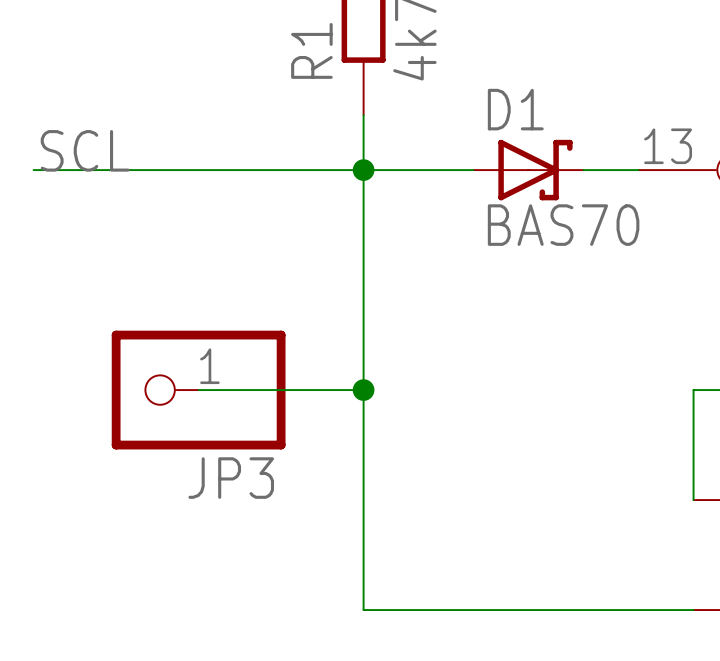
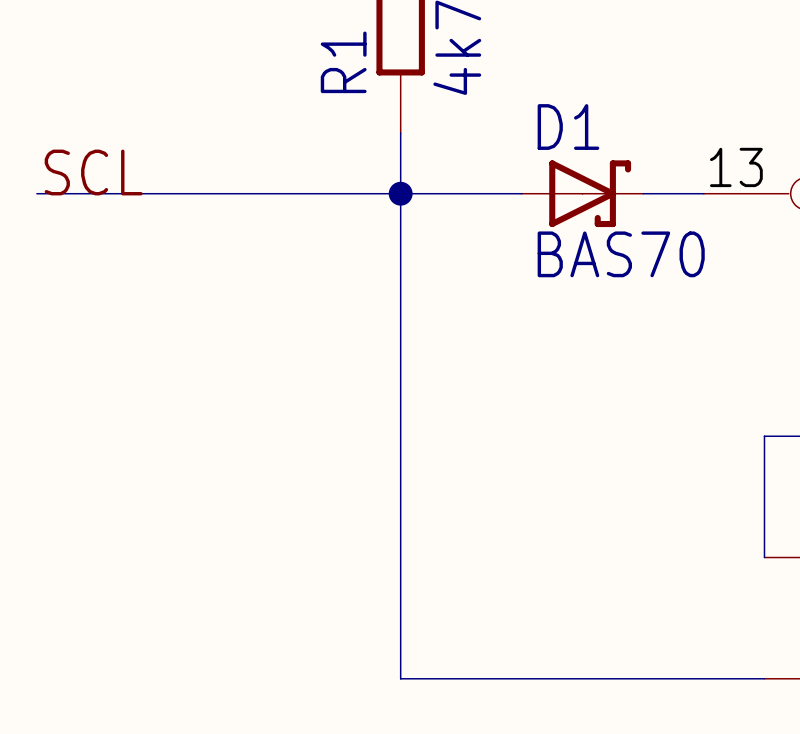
wire: (198, 390) (363, 390) -> none
JP3: (198, 390) -> none
junction: (363, 390) -> none

